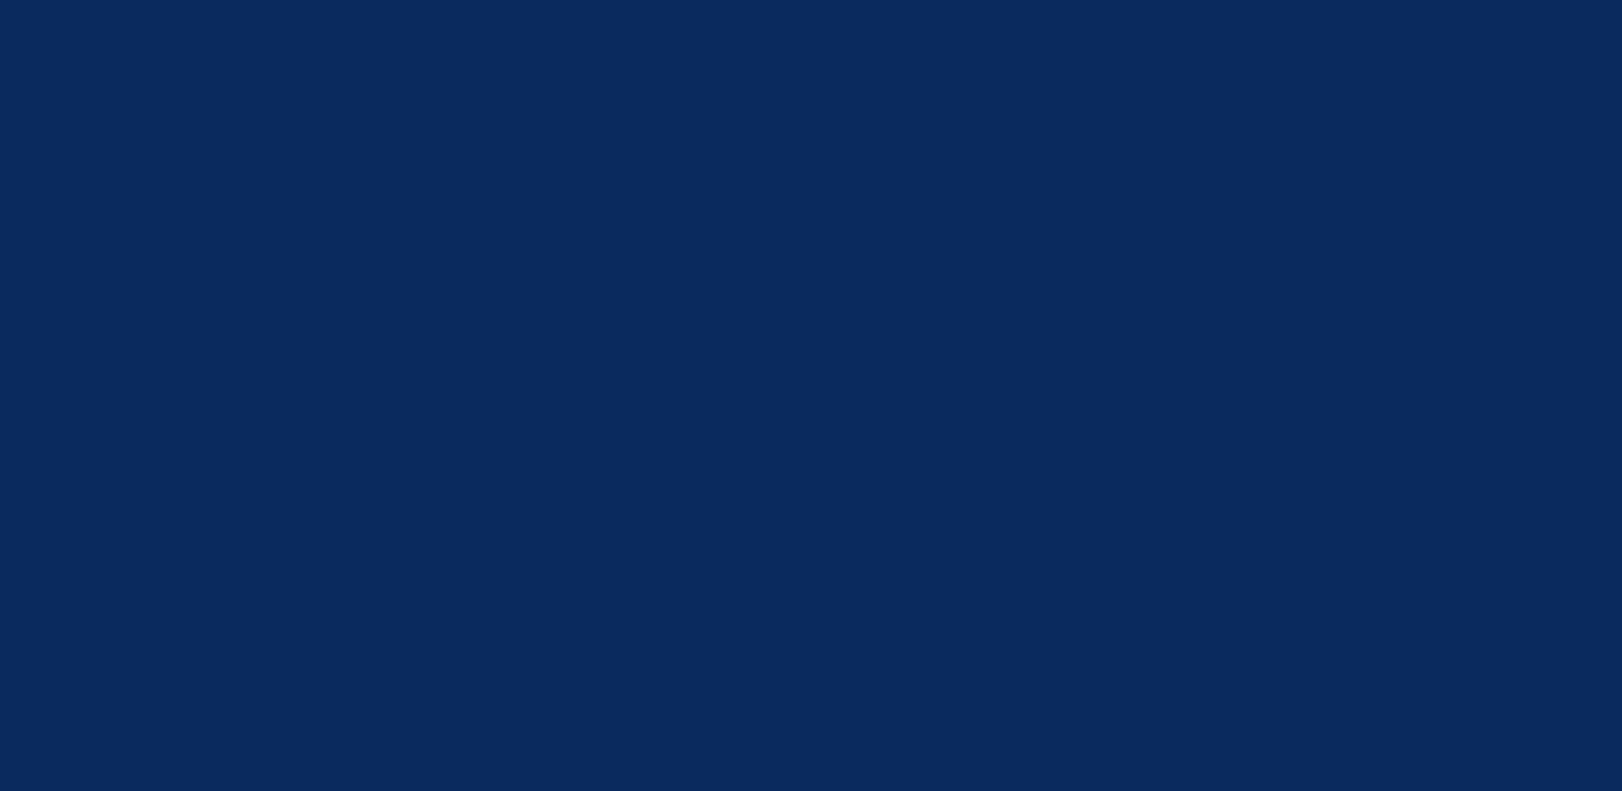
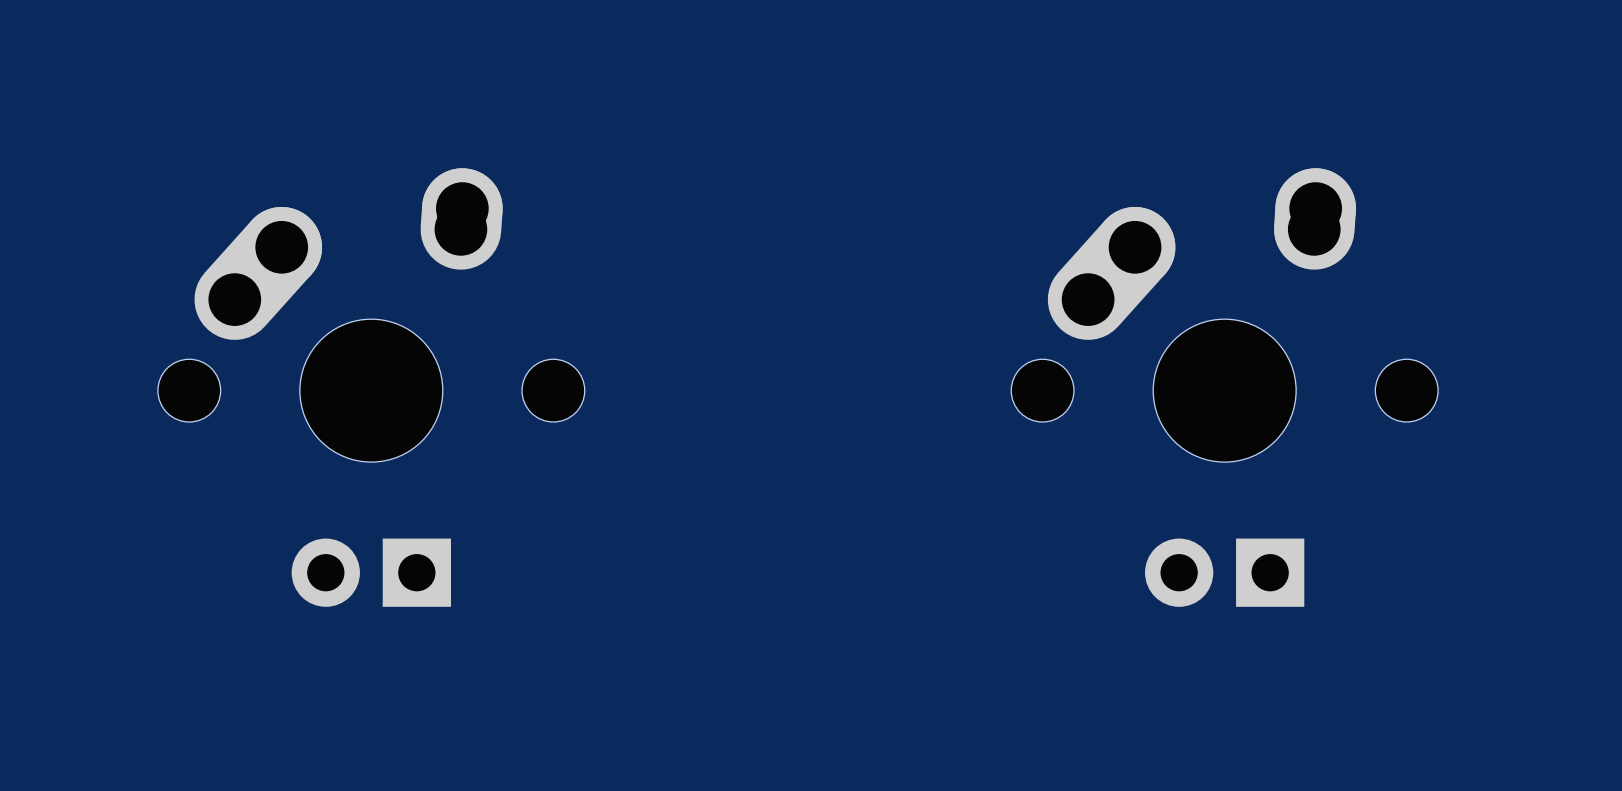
part: none -> (371, 387)
part: none -> (1224, 387)

